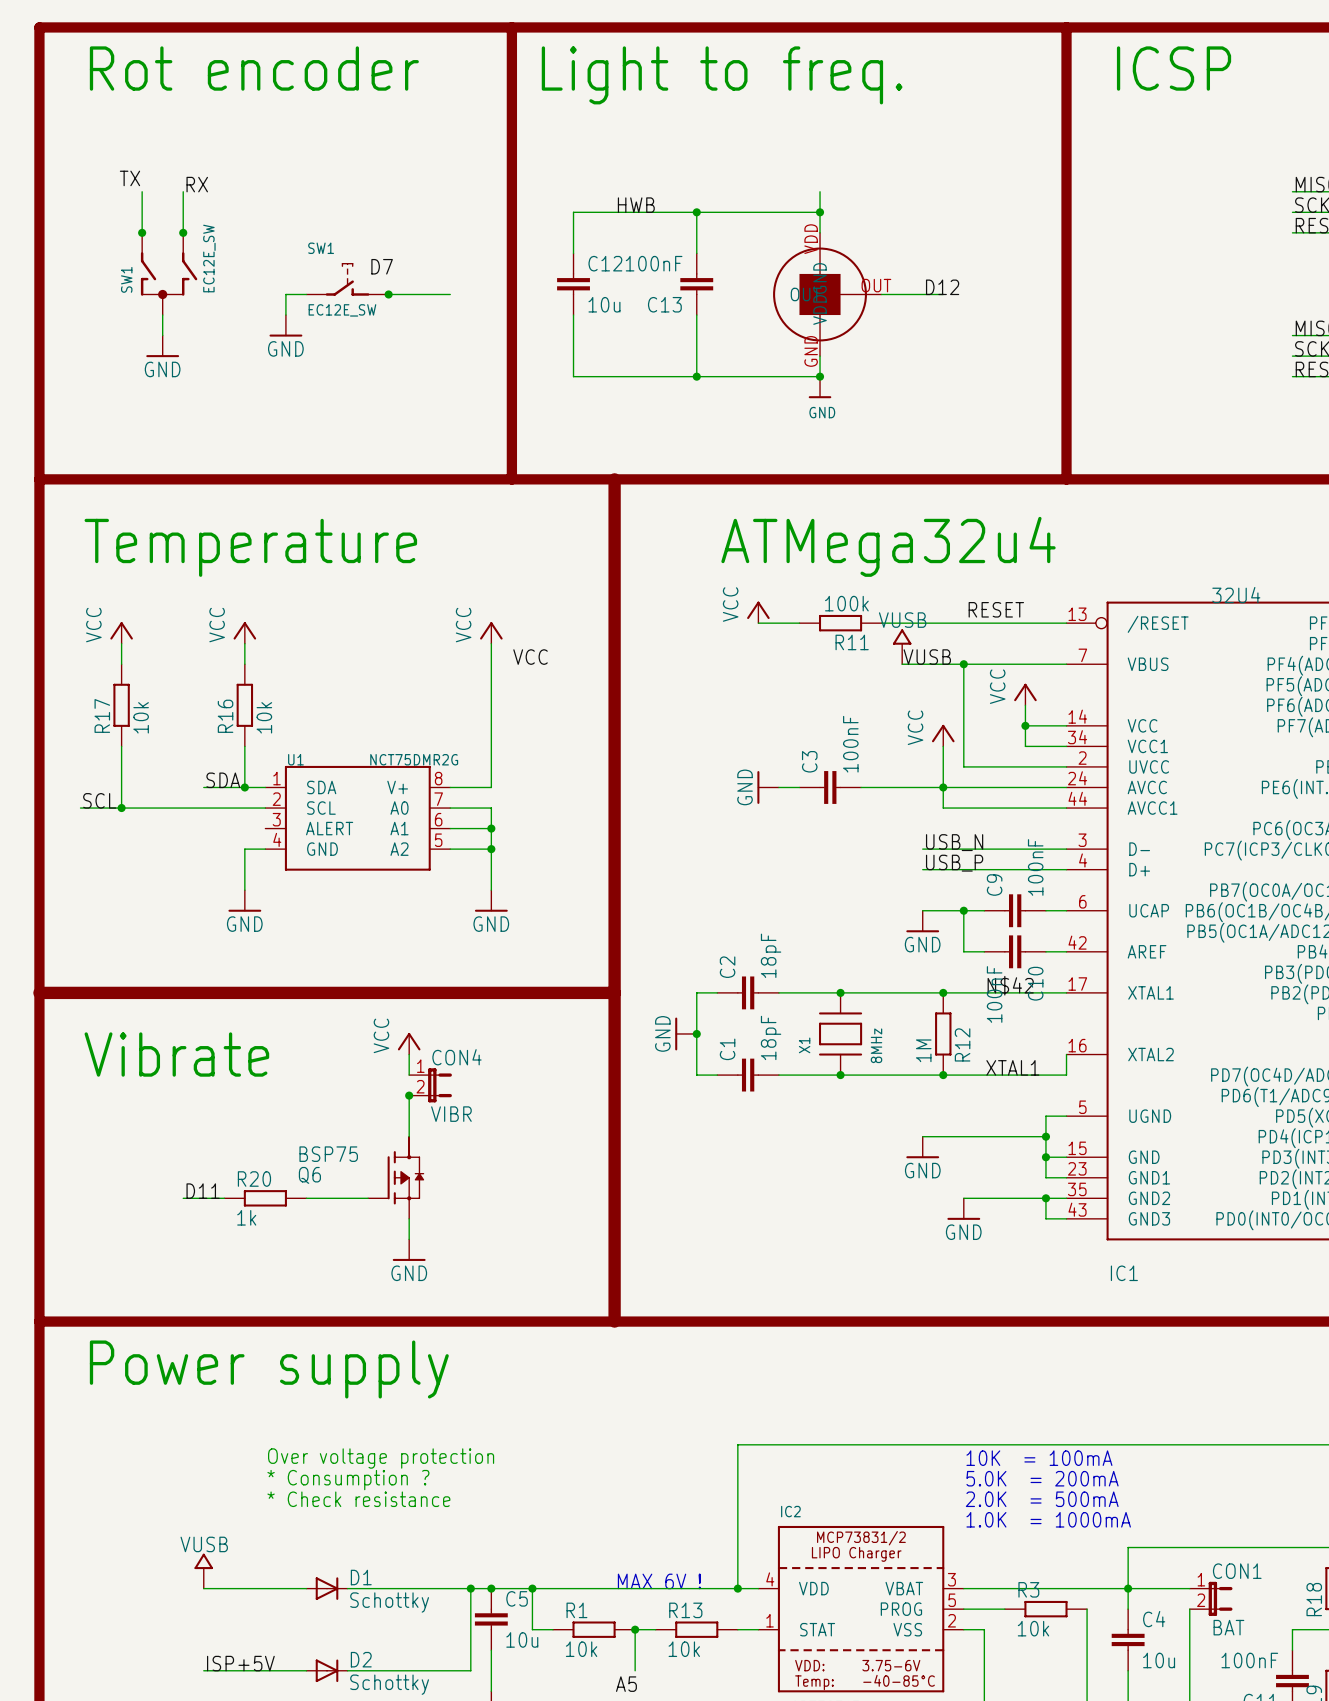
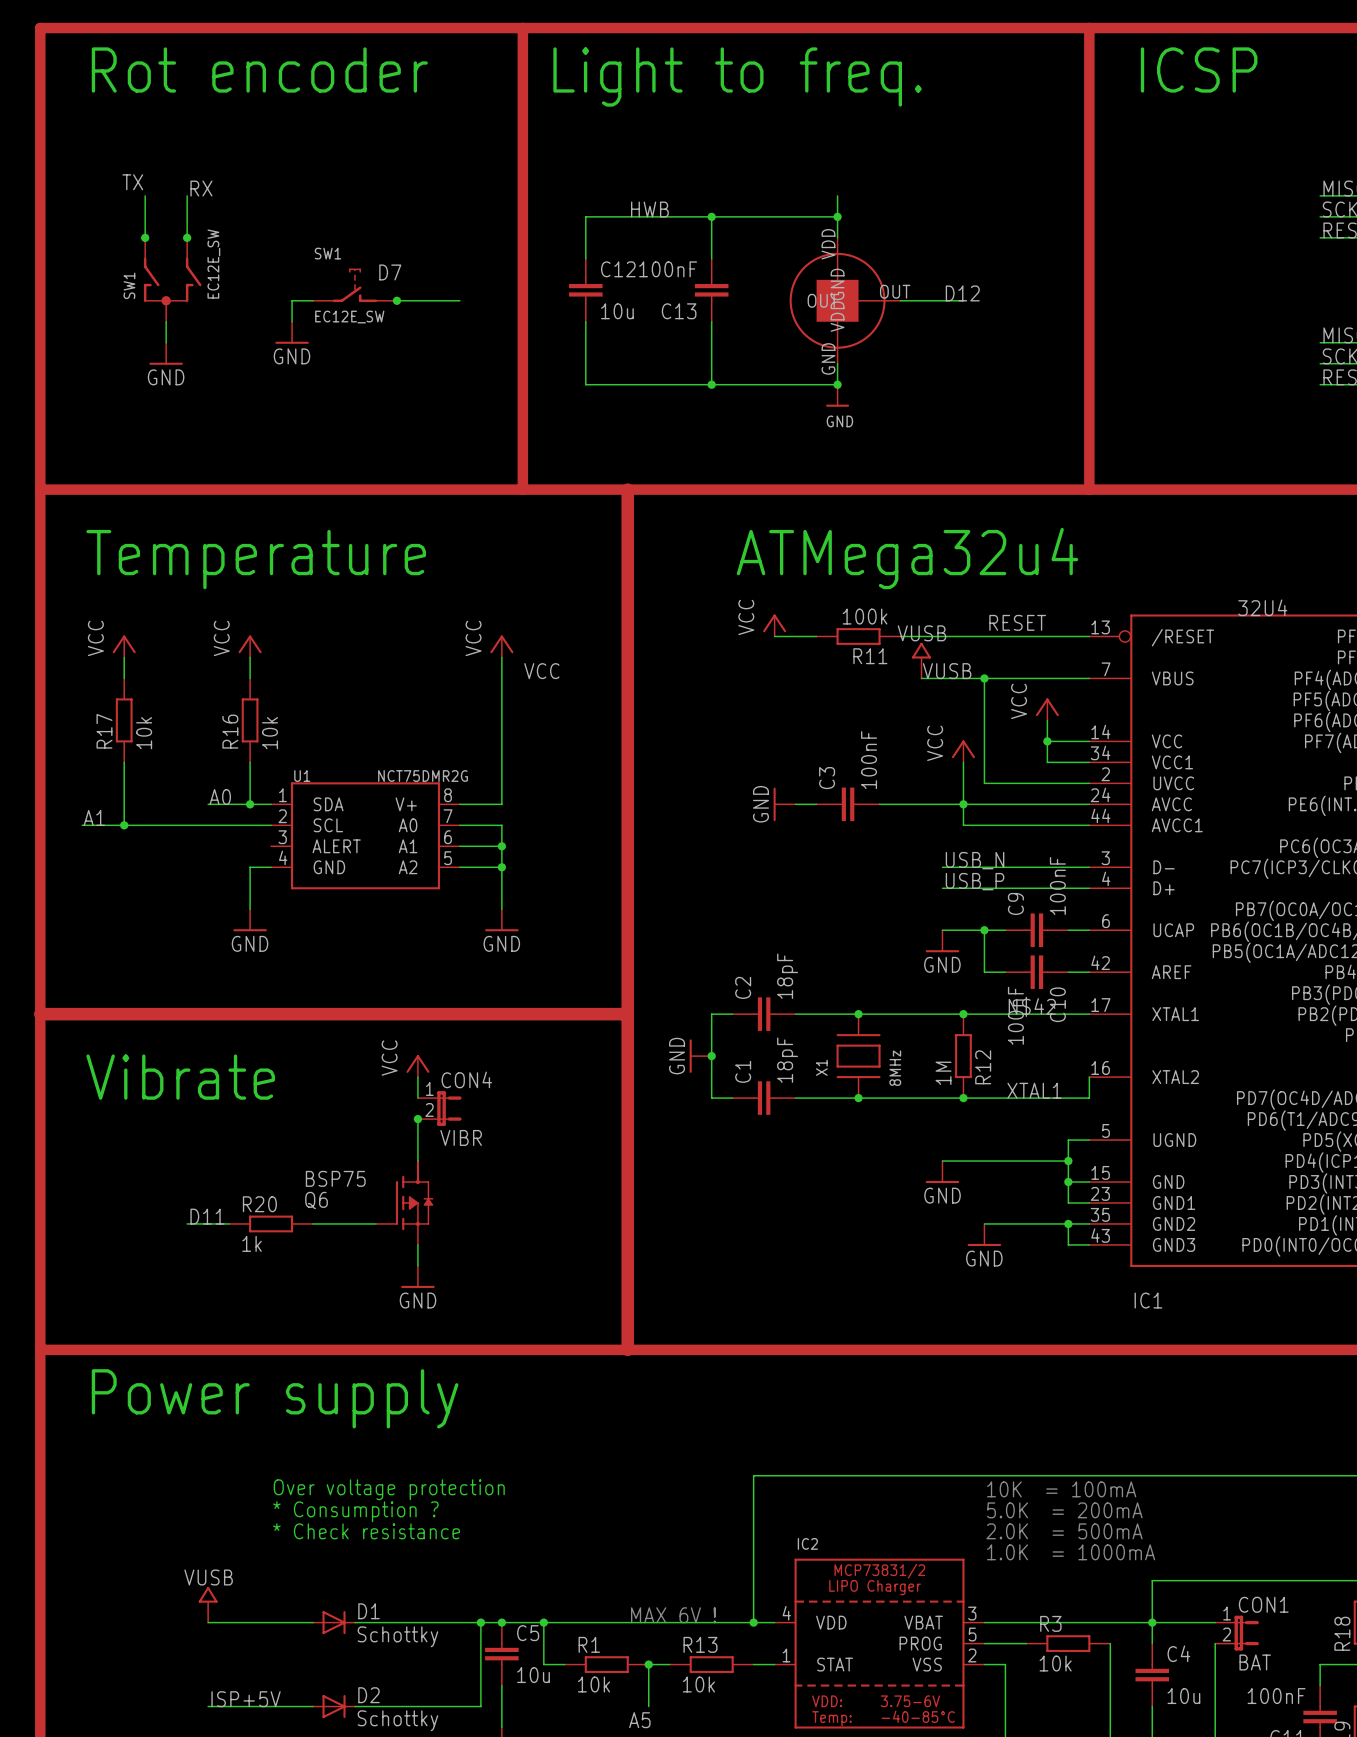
label: SDA (223, 780) -> A0 (220, 797)
label: SCL (99, 800) -> A1 (94, 817)

